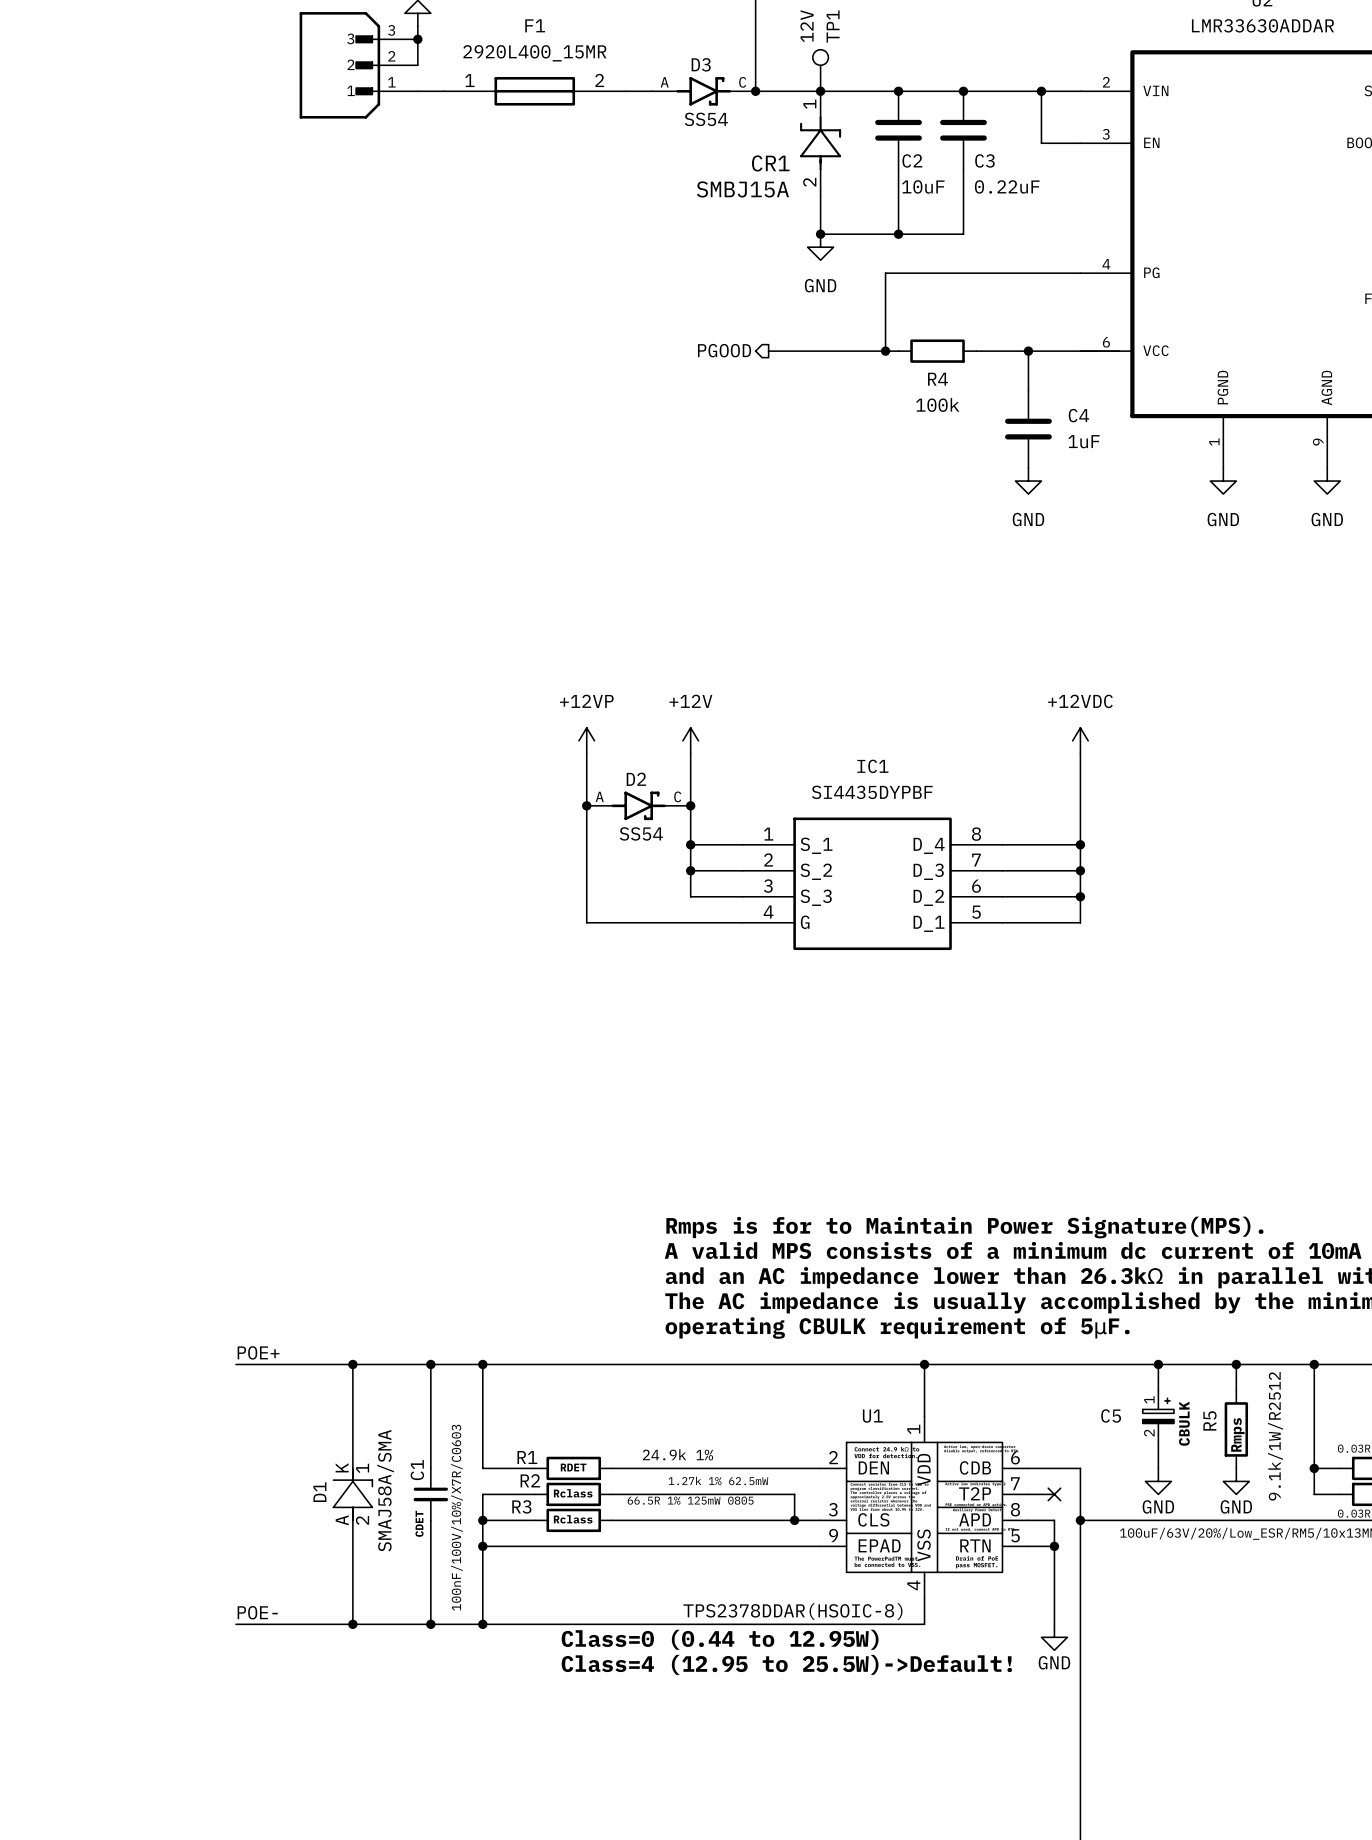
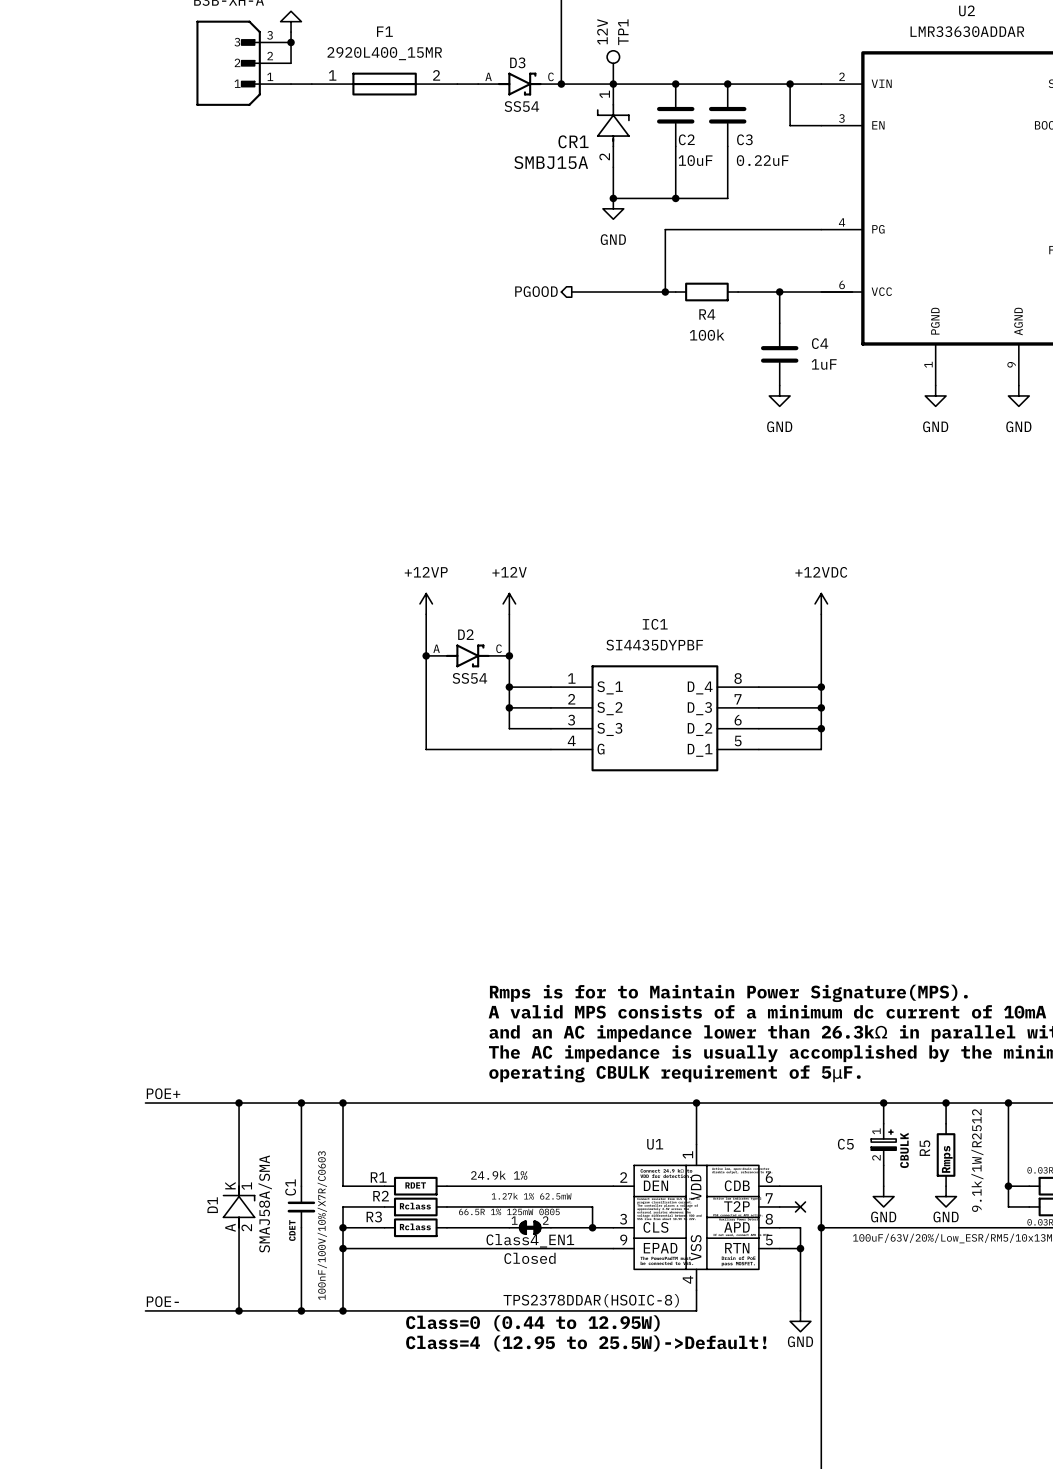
Class4_EN1: none -> Closed (530, 1227)

